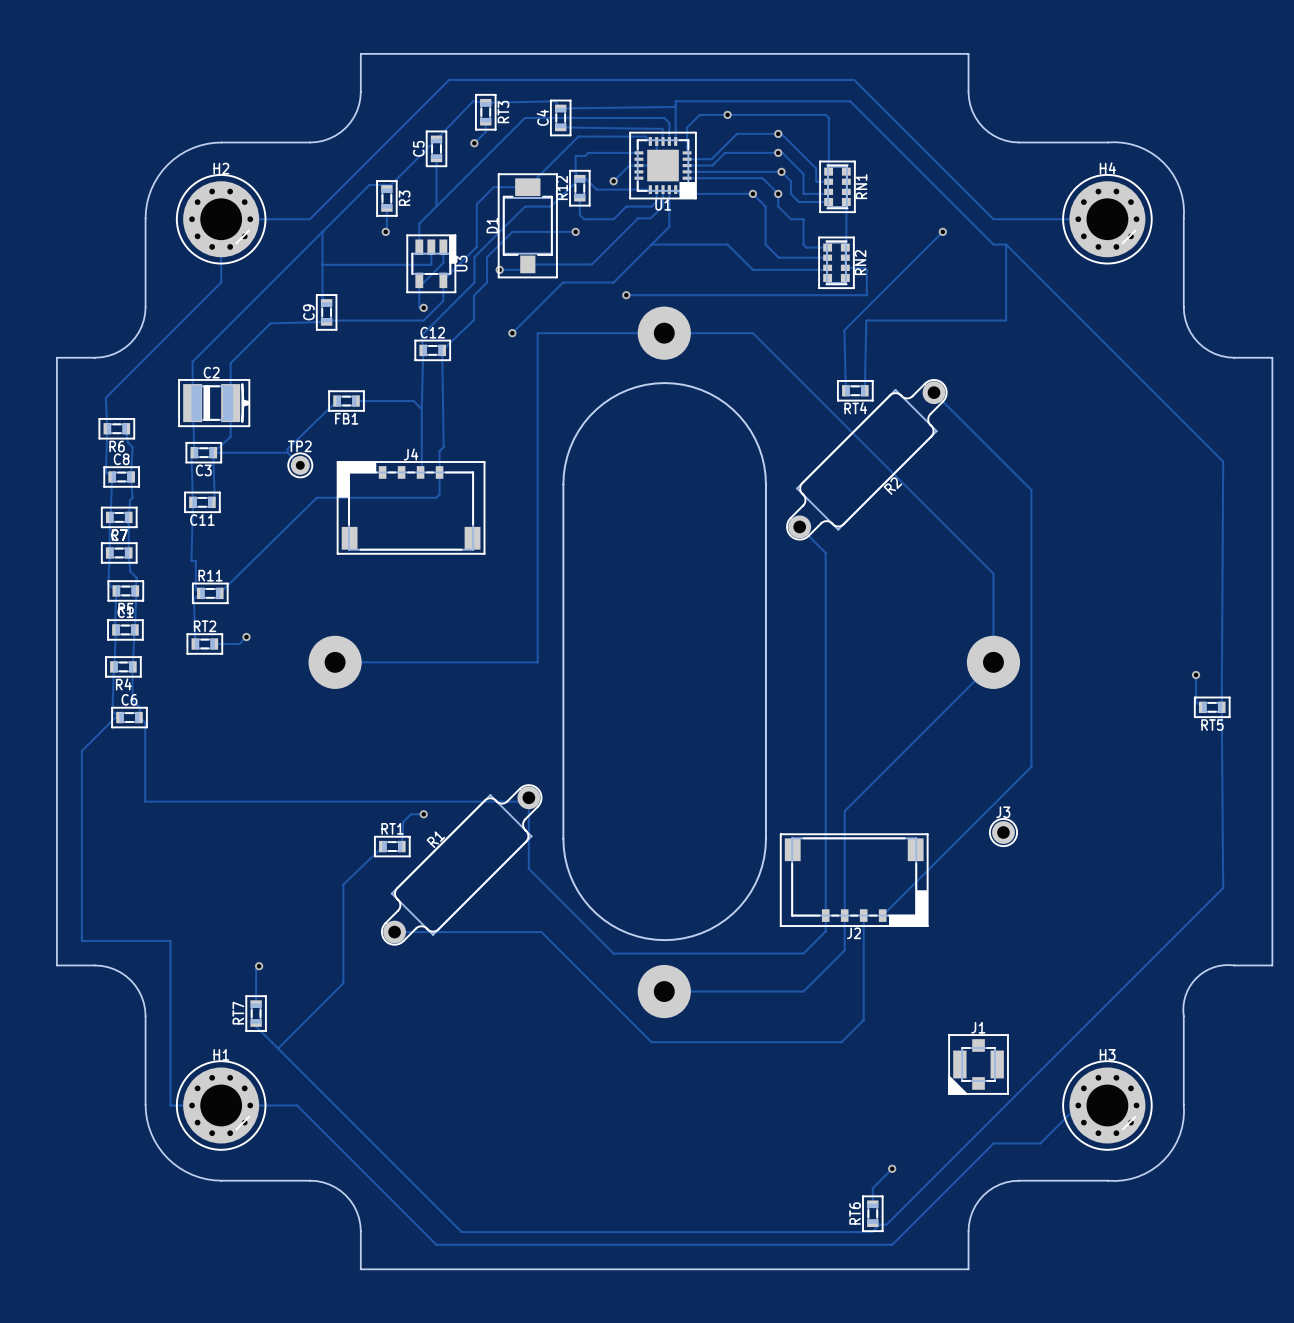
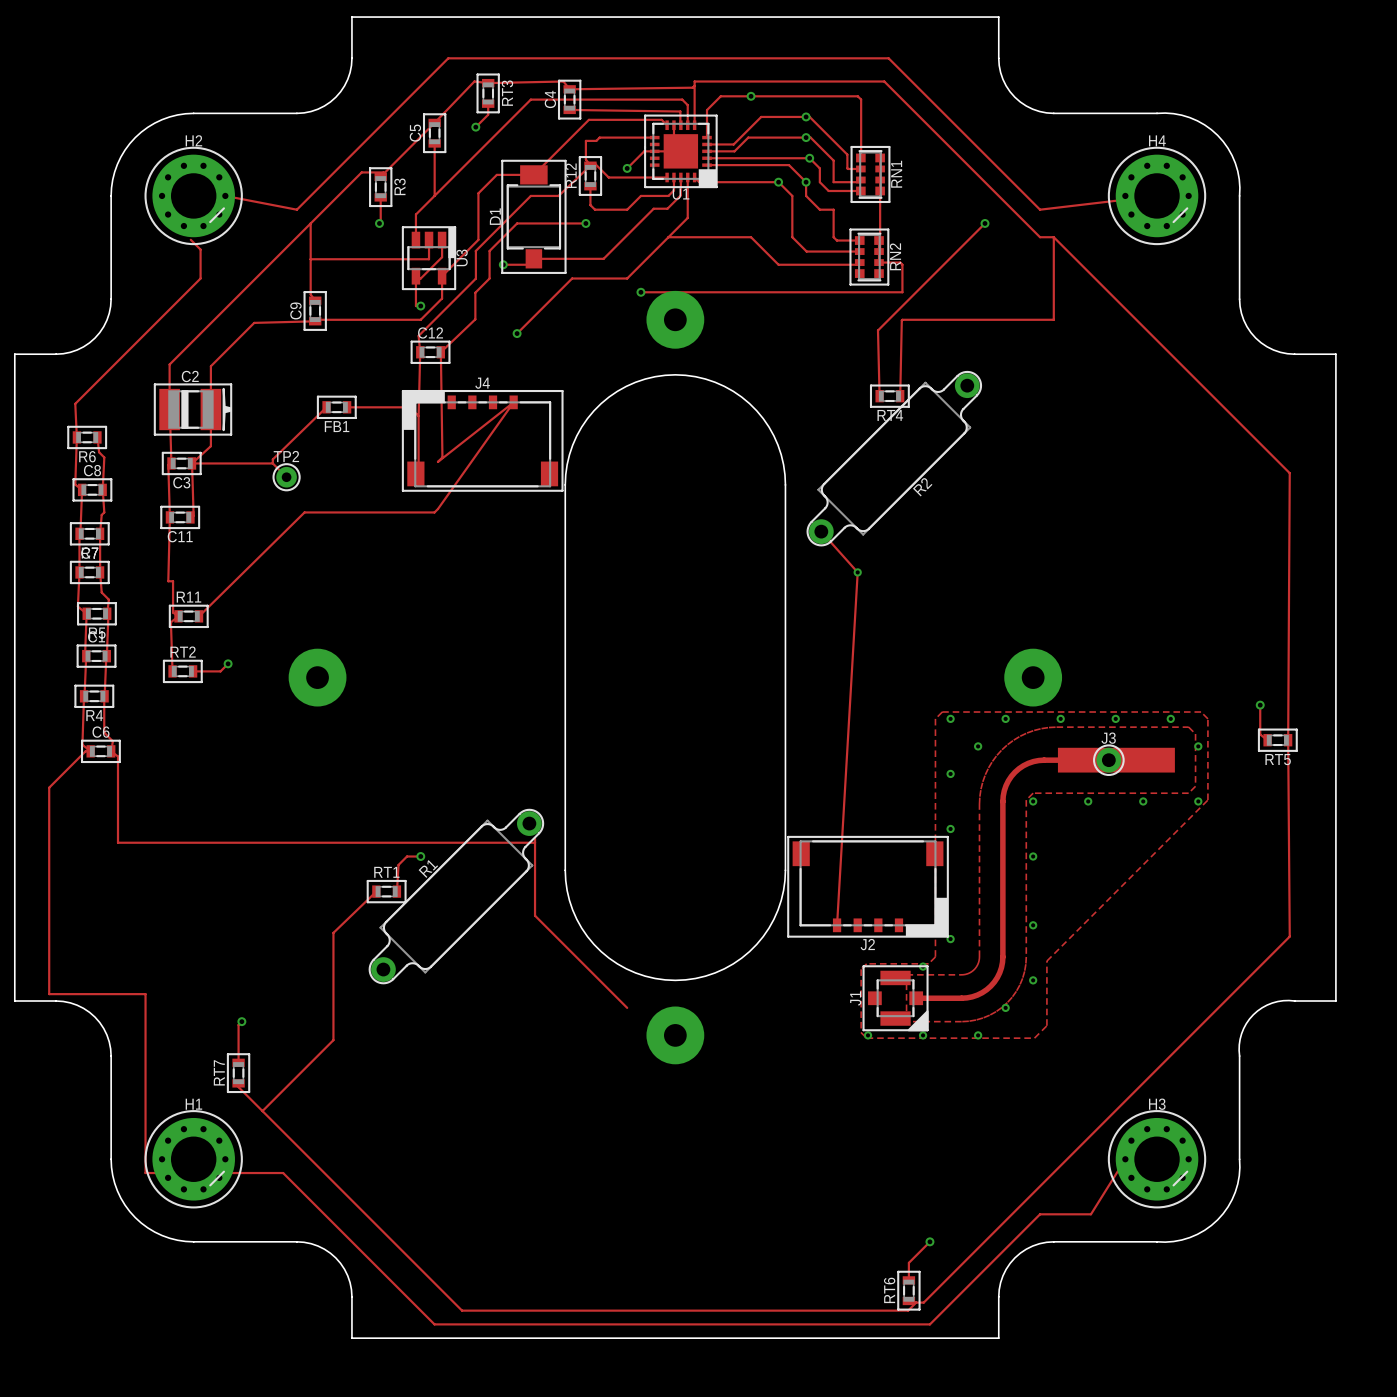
board edge: (360, 53) (968, 53) (970, 104) (978, 122) (993, 135) (1006, 140) (1019, 142) (1115, 142) (1130, 144) (1151, 153) (1163, 162) (1173, 174) (1179, 188) (1183, 203) (1183, 307) (1185, 320) (1190, 332) (1203, 347) (1221, 356) (1272, 357) (1272, 965) (1218, 965) (1200, 974) (1190, 986) (1183, 1005) (1184, 1112) (1182, 1127) (1173, 1148) (1163, 1160) (1151, 1170) (1137, 1176) (1123, 1180) (1019, 1180) (1006, 1182) (993, 1187) (978, 1200) (970, 1218) (968, 1269) (360, 1269) (359, 1218) (350, 1200) (335, 1187) (323, 1182) (310, 1180) (206, 1179) (179, 1167) (158, 1146) (151, 1133) (145, 1112) (145, 1016) (143, 1003) (138, 990) (125, 975) (108, 967) (56, 965) (56, 357) (108, 356) (125, 347) (138, 332) (143, 320) (145, 307) (147, 203) (154, 182) (167, 164) (185, 151) (206, 143) (310, 142) (323, 140) (335, 135) (350, 122) (359, 104) (360, 53) -> (351, 17) (350, 72) (340, 91) (324, 105) (311, 111) (296, 113) (177, 114) (154, 123) (135, 137) (120, 157) (112, 179) (111, 299) (109, 313) (103, 326) (89, 342) (70, 352) (14, 354) (14, 1001) (70, 1002) (89, 1012) (103, 1028) (109, 1041) (111, 1056) (111, 1167) (117, 1190) (125, 1205) (135, 1217) (147, 1227) (162, 1235) (177, 1240) (296, 1241) (311, 1243) (324, 1249) (340, 1263) (350, 1282) (351, 1338) (998, 1338) (1000, 1282) (1010, 1263) (1026, 1249) (1039, 1243) (1053, 1241) (1173, 1241) (1189, 1237) (1204, 1230) (1217, 1219) (1228, 1206) (1237, 1184) (1239, 1167) (1239, 1044) (1246, 1023) (1257, 1011) (1277, 1001) (1335, 1001) (1335, 354) (1280, 352) (1261, 342) (1246, 326) (1241, 313) (1239, 299) (1239, 179) (1235, 163) (1228, 148) (1217, 135) (1204, 124) (1181, 115) (1165, 113) (1053, 113) (1039, 111) (1026, 105) (1010, 91) (1000, 72) (998, 17) (351, 17)
H2 position: (221, 219) -> (193, 195)
track: (250, 219) (309, 219) -> (225, 195) (296, 209)
track: (993, 219) (1107, 219) -> (1040, 209) (1157, 195)
H4 position: (1107, 219) -> (1157, 195)
part position: (664, 333) -> (675, 319)
track: (934, 392) (1031, 490) (1031, 766) (882, 915) -> none
track: (439, 451) (439, 494) -> (437, 461) (513, 402) (437, 509)
R2 position: (866, 459) -> (894, 458)
board edge: (563, 484) (563, 838) (567, 866) (574, 884) (589, 907) (603, 919) (619, 929) (636, 936) (655, 939) (674, 939) (692, 936) (717, 924) (739, 907) (755, 884) (764, 857) (765, 838) (765, 484) (762, 456) (755, 439) (745, 423) (732, 409) (717, 398) (701, 389) (683, 384) (655, 383) (636, 386) (619, 393) (603, 403) (589, 416) (578, 431) (570, 447) (565, 465) (563, 484) -> (565, 484) (565, 870) (569, 900) (576, 919) (594, 944) (609, 958) (626, 968) (645, 976) (665, 979) (685, 979) (705, 976) (733, 963) (756, 944) (773, 919) (783, 890) (785, 870) (785, 484) (781, 454) (773, 435) (763, 418) (749, 403) (733, 391) (715, 382) (695, 376) (665, 375) (645, 379) (626, 386) (609, 397) (594, 410) (581, 426) (572, 445) (567, 464) (565, 484)
J4 position: (411, 507) -> (482, 440)
track: none -> (821, 531) (857, 572) (837, 925)
track: (799, 526) (825, 552) (825, 931) (803, 953) (613, 953) -> none
via: none -> (857, 572)
track: (335, 662) (537, 662) (537, 333) (752, 333) (993, 573) (993, 662) (844, 811) (844, 950) (803, 991) (664, 991) -> none
part position: (335, 662) -> (317, 677)
part position: (993, 662) -> (1033, 677)
zone outline: none -> (942, 712) (1201, 712) (1207, 718) (1207, 800) (1046, 961) (1046, 1025) (1034, 1038) (866, 1038) (861, 1032) (861, 969) (866, 963) (928, 963) (935, 956) (935, 718) (942, 712)
via: none -> (950, 718)
via: none -> (1005, 718)
via: none -> (1060, 718)
via: none -> (1115, 718)
via: none -> (1170, 718)
zone outline: none -> (1056, 727) (1188, 727) (1195, 734) (1195, 786) (1188, 793) (1033, 793) (1026, 800) (1025, 964) (1022, 978) (1016, 991) (1007, 1002) (996, 1011) (975, 1020) (906, 1021) (906, 974) (963, 974) (972, 971) (978, 961) (979, 796) (988, 767) (1002, 749) (1020, 736) (1034, 730) (1056, 727)
via: none -> (978, 746)
via: none -> (1198, 746)
drawing: none -> [1057, 747, 1175, 773]
track: none -> (1108, 760) (1038, 760) (1023, 765) (1011, 776) (1004, 790) (1002, 801) (1002, 956) (999, 972) (986, 989) (972, 996) (916, 998)
via: none -> (950, 773)
via: none -> (1033, 801)
via: none -> (1088, 801)
via: none -> (1143, 801)
via: none -> (1198, 801)
via: none -> (950, 828)
via: none -> (1033, 856)
J3 position: (1003, 832) -> (1108, 760)
R1 position: (461, 864) -> (456, 896)
via: none -> (1033, 925)
J2 position: (854, 880) -> (868, 886)
via: none -> (950, 939)
track: (863, 915) (863, 1020) (841, 1042) (651, 1042) (541, 932) (394, 932) -> none
via: none -> (923, 966)
via: none -> (1033, 980)
via: none -> (1005, 1007)
via: none -> (868, 1035)
via: none -> (923, 1035)
via: none -> (978, 1035)
part position: (664, 991) -> (675, 1035)
J1 rotation: 0° (978, 1064) -> 90° counterclockwise (895, 998)
J1 position: (978, 1064) -> (895, 998)
H1 position: (221, 1105) -> (193, 1159)
track: (1078, 1105) (1040, 1143) -> (1125, 1159) (1090, 1214)
H3 position: (1107, 1105) -> (1157, 1159)

